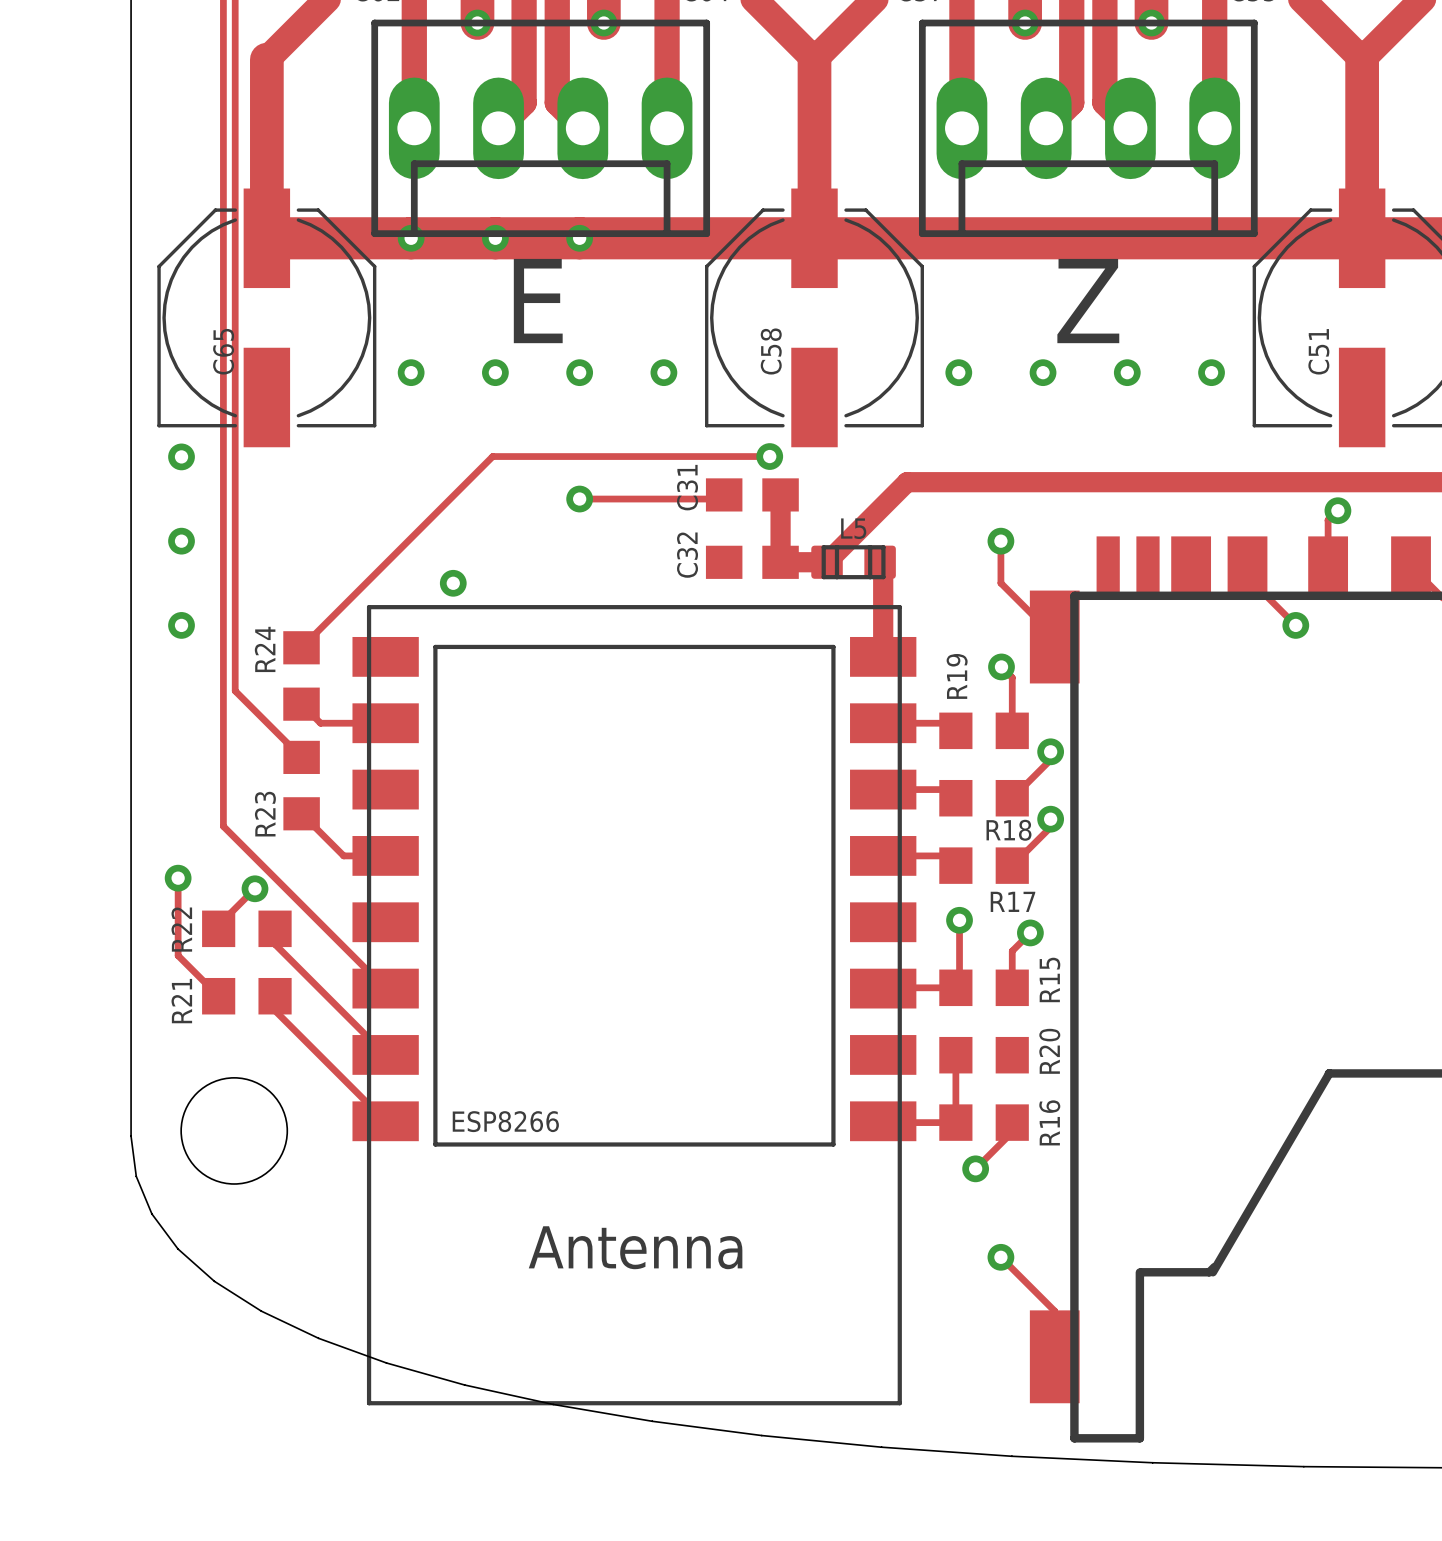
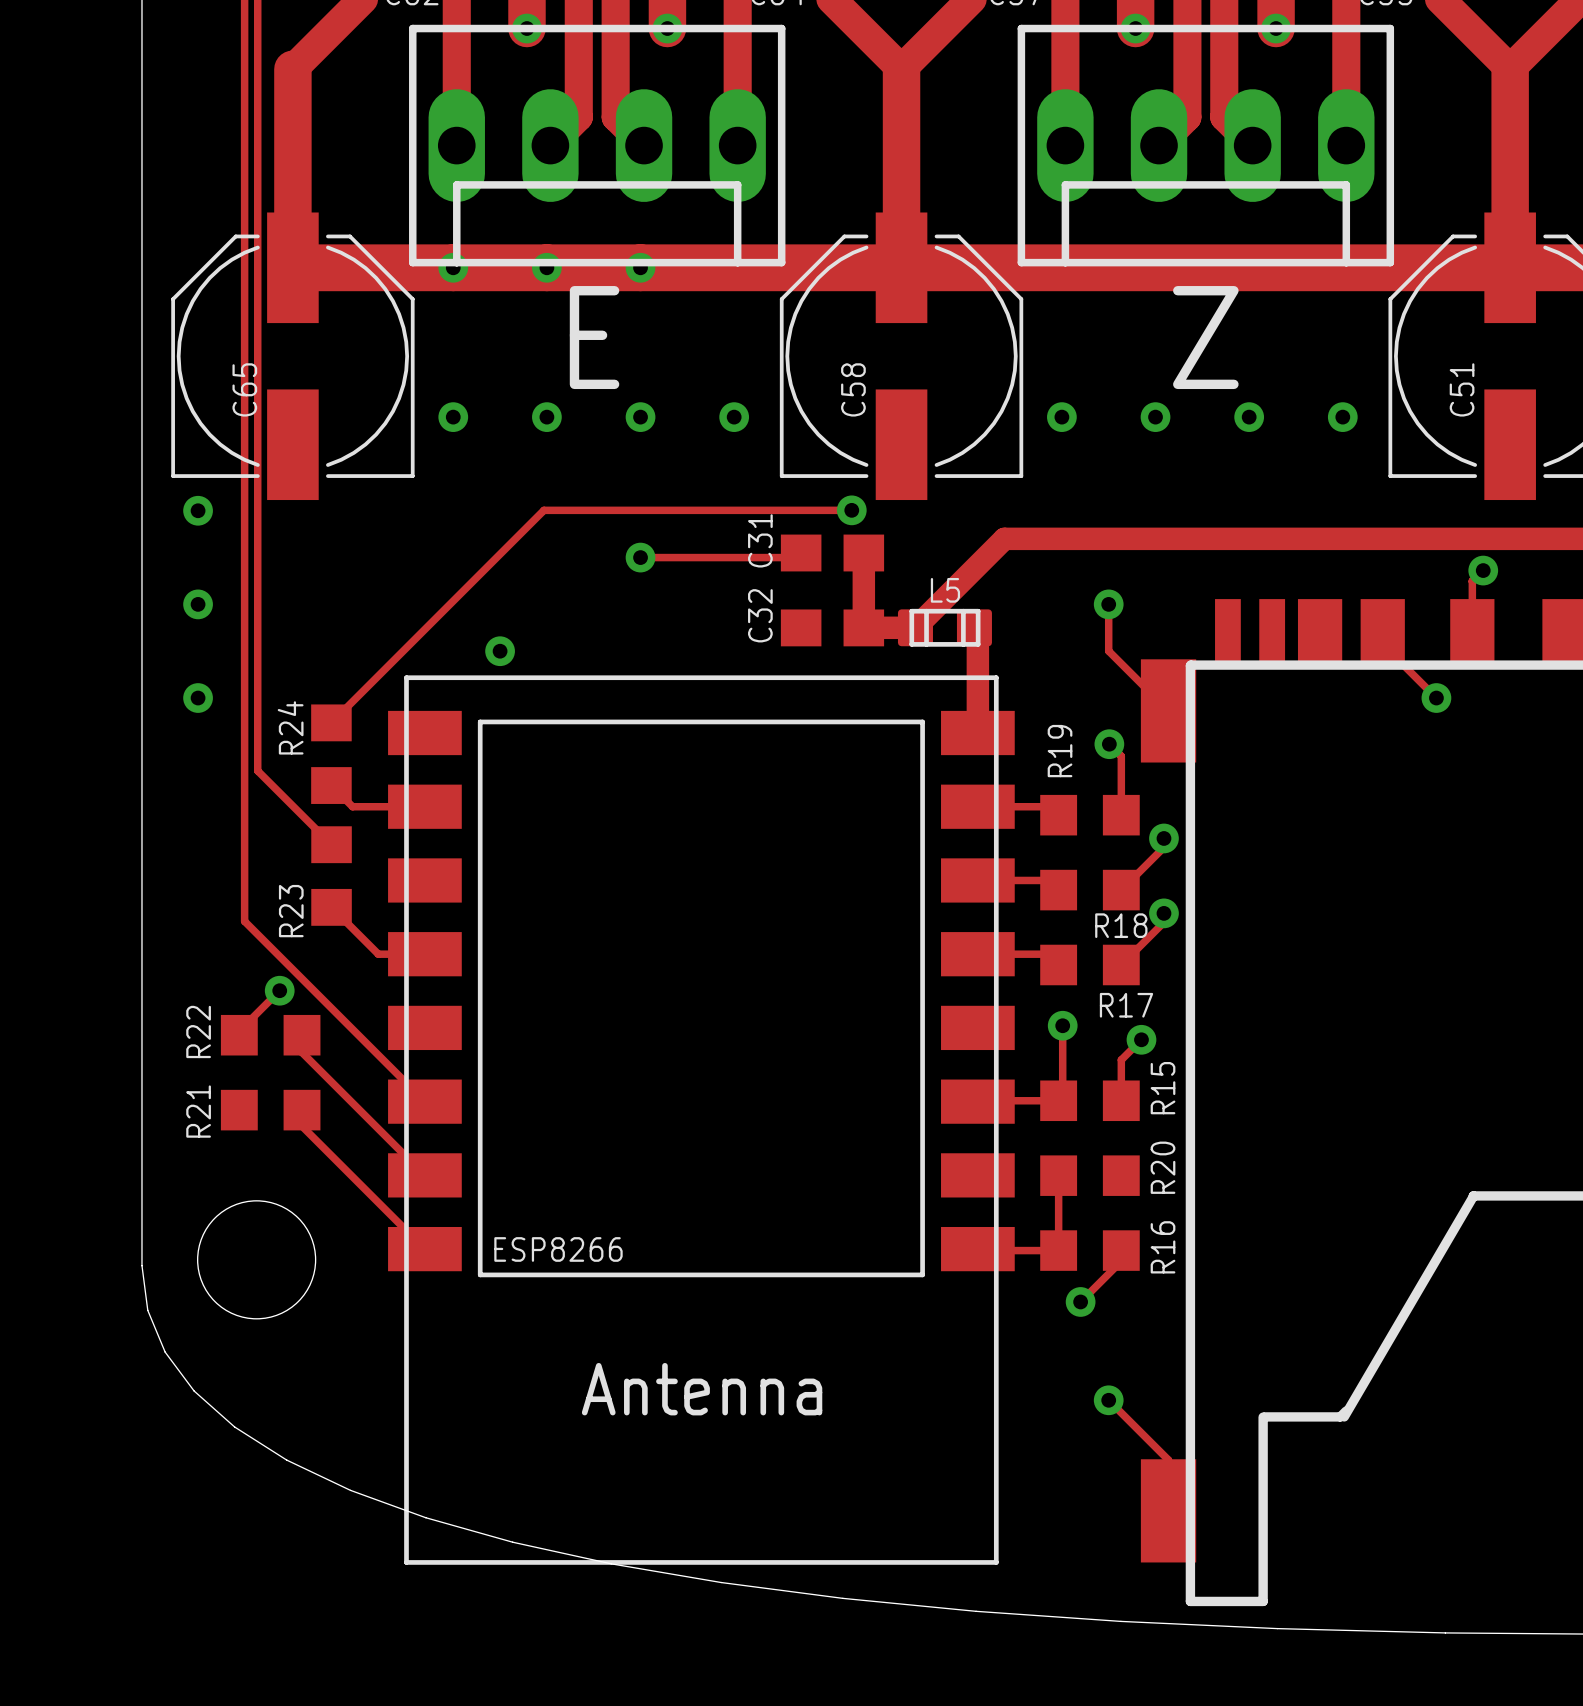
track: (178, 878) (178, 955) (218, 996) -> none
via: (178, 878) -> none

